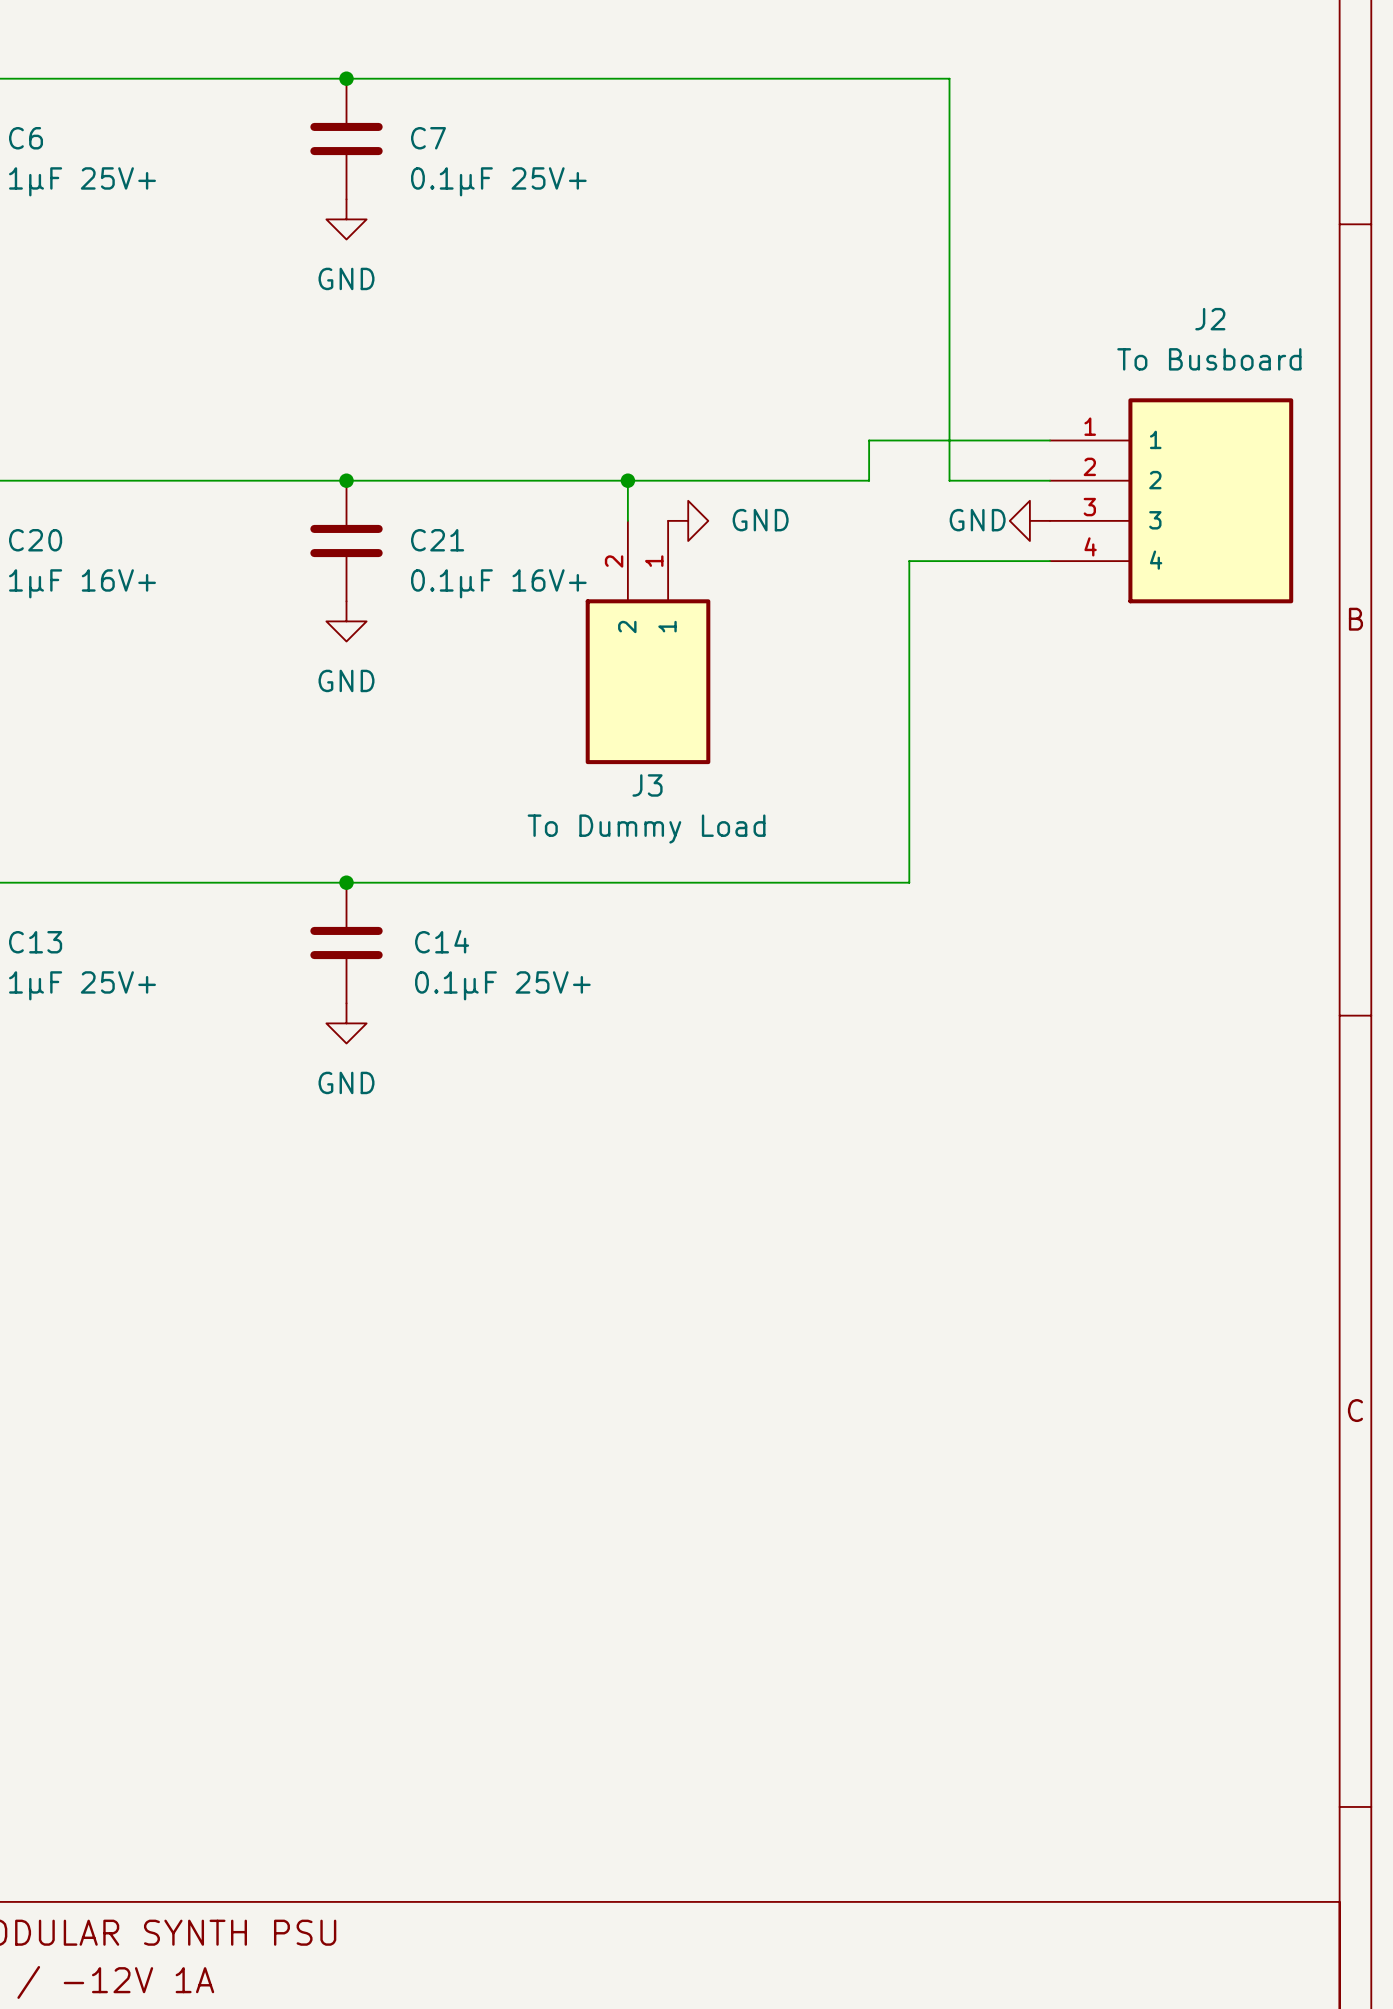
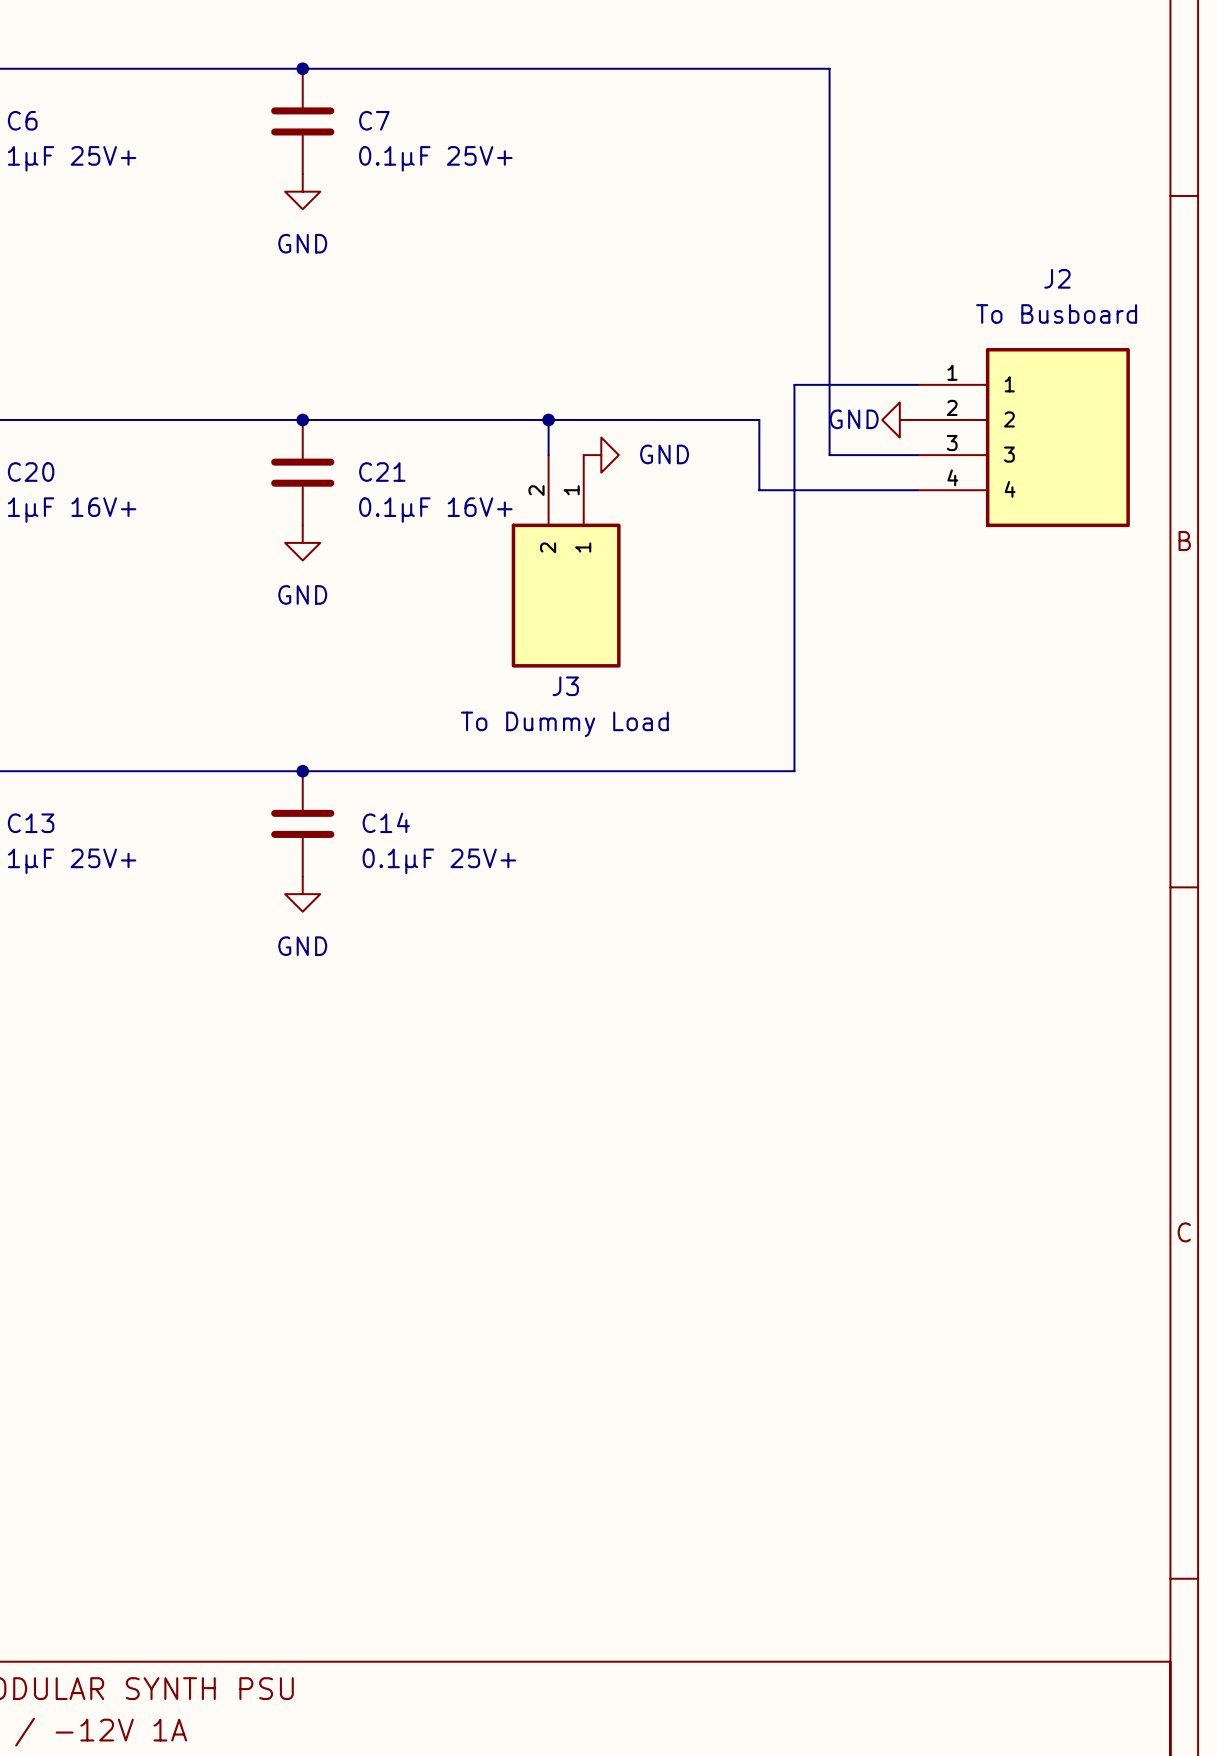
wire: (909, 440) (869, 440) (869, 480) -> (794, 384) (794, 490) (759, 490) (759, 419)
wire: (949, 480) (1050, 480) -> (829, 419) (829, 455) (917, 455)
power symbol position: GND (1029, 520) -> GND (899, 419)

